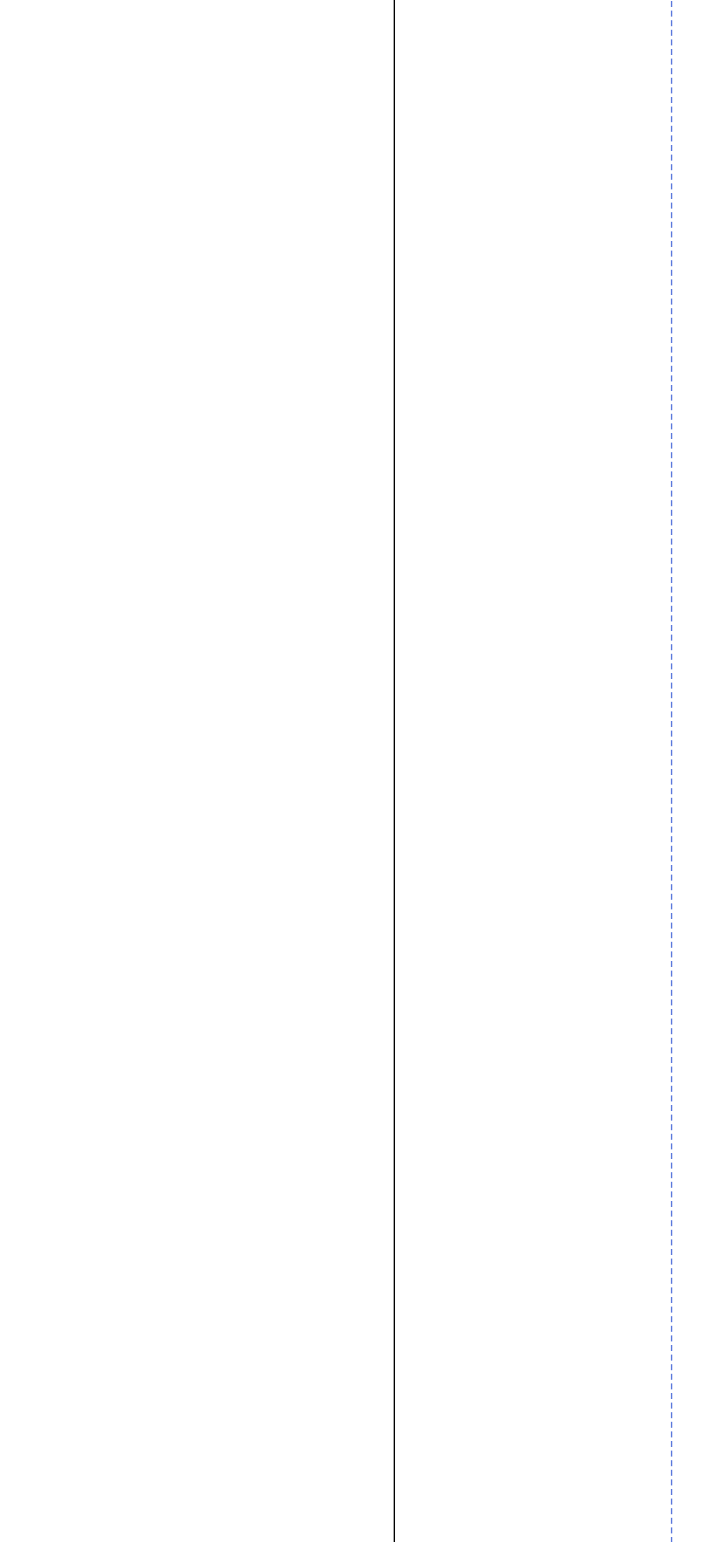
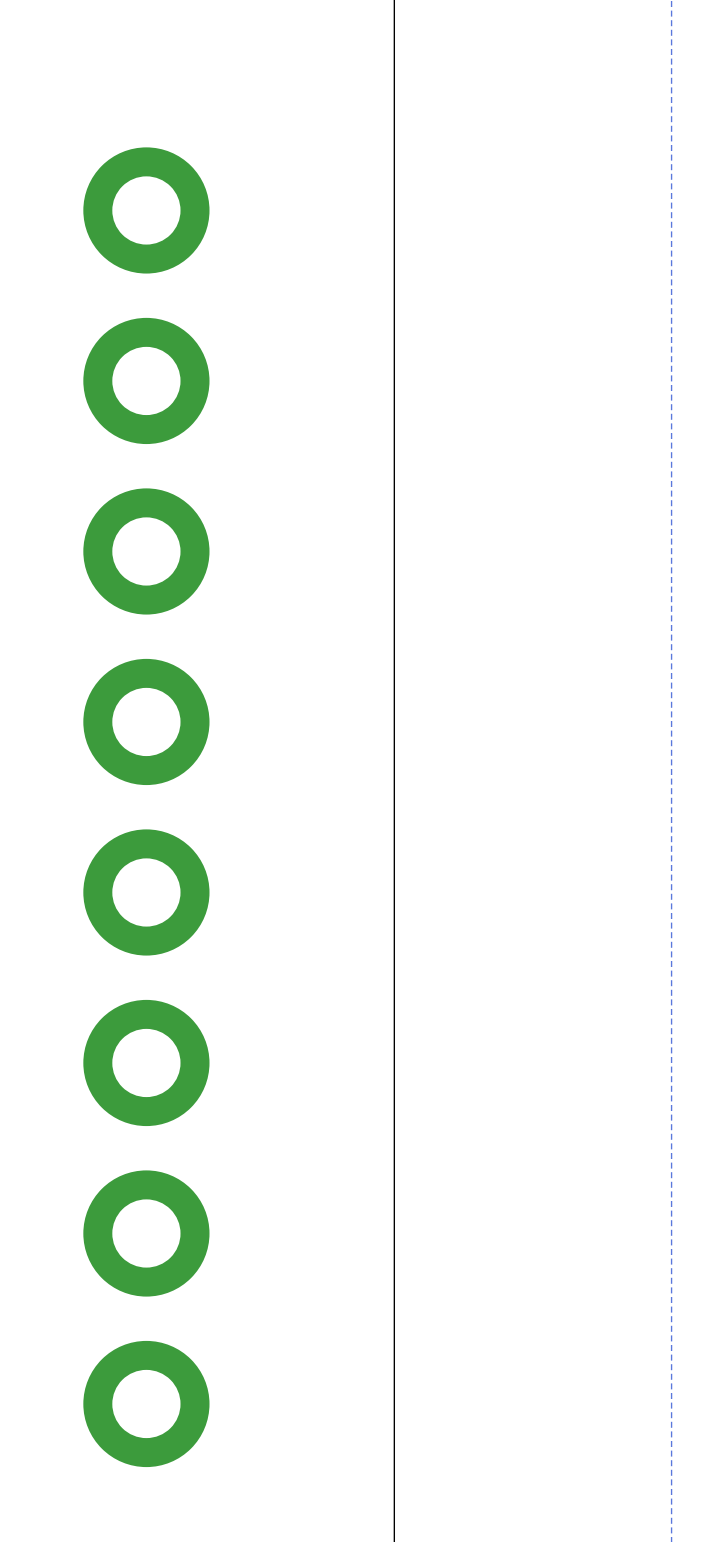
part: none -> (146, 807)

